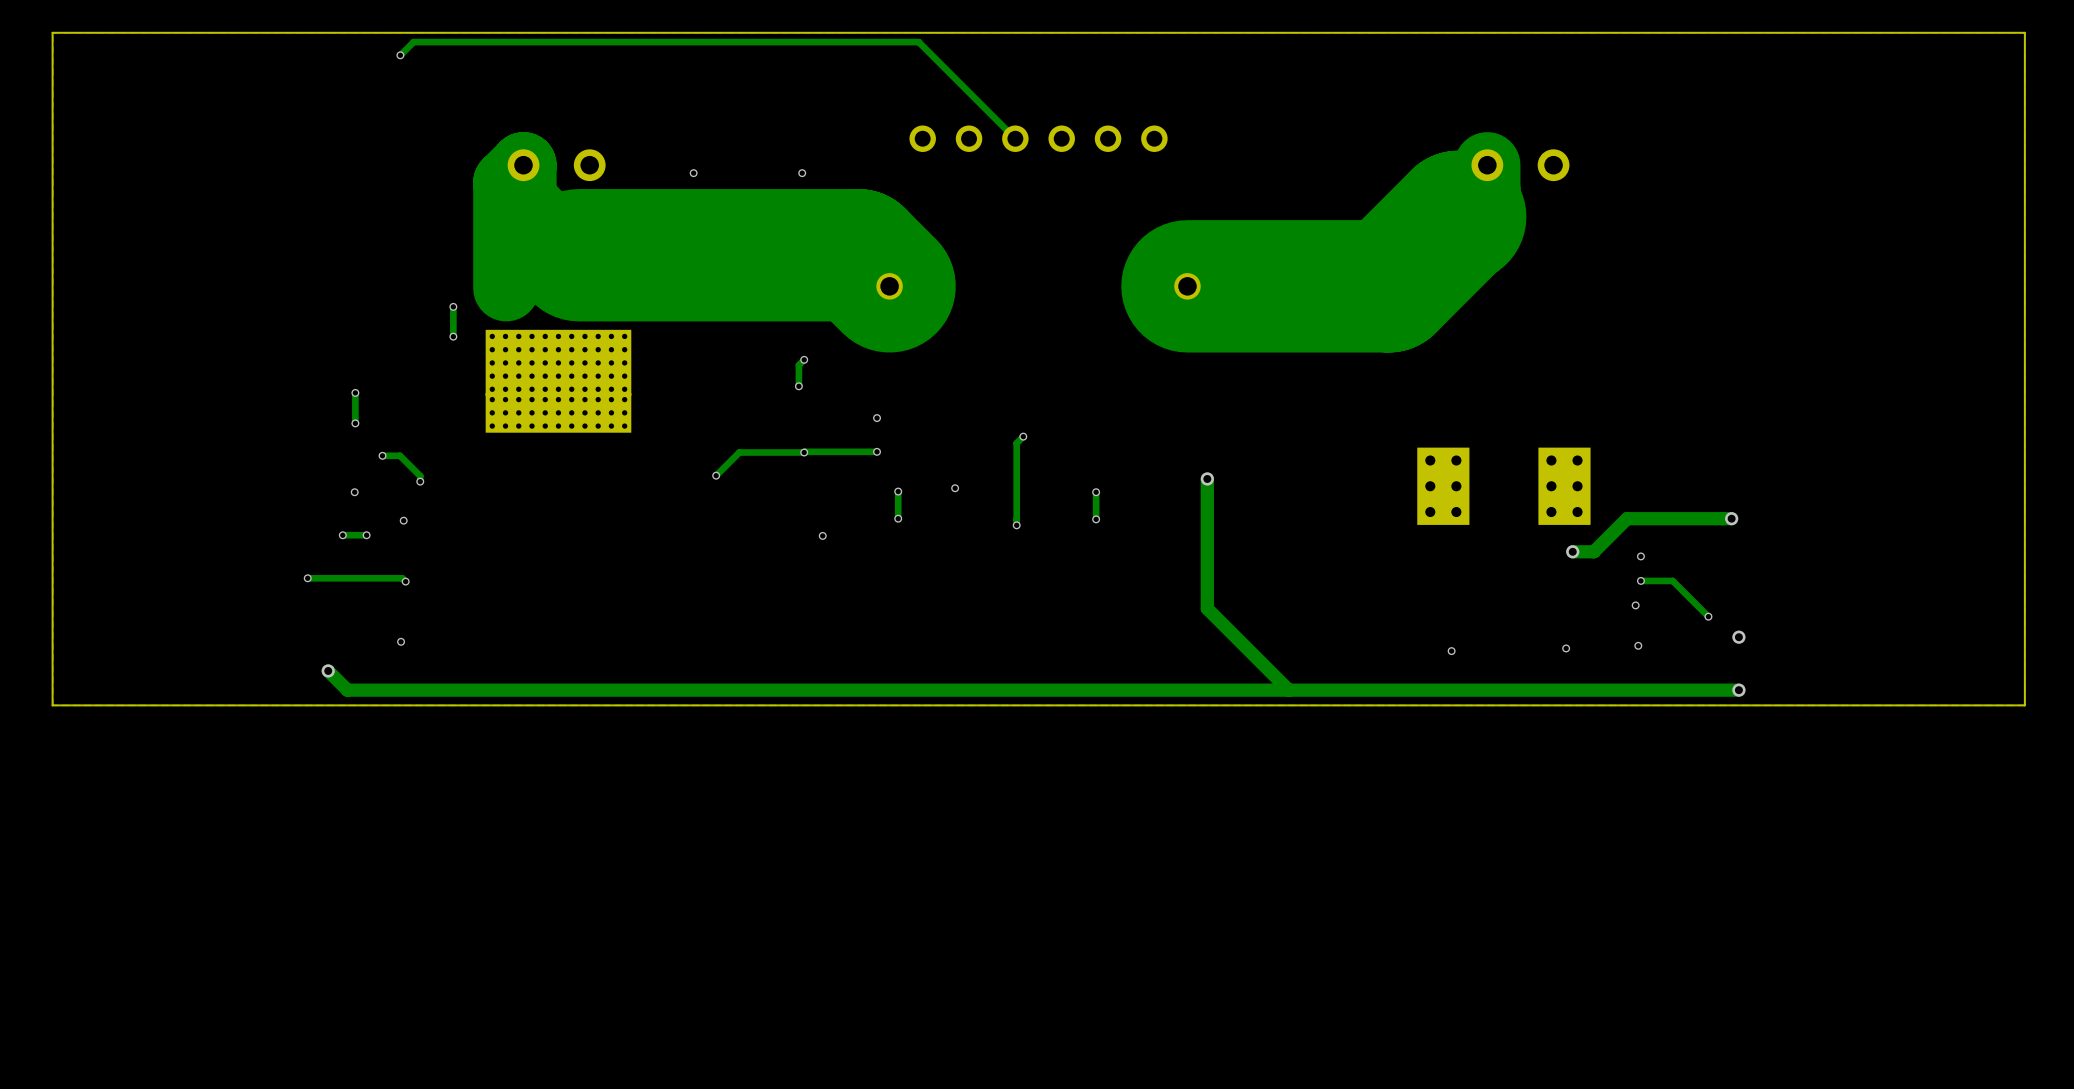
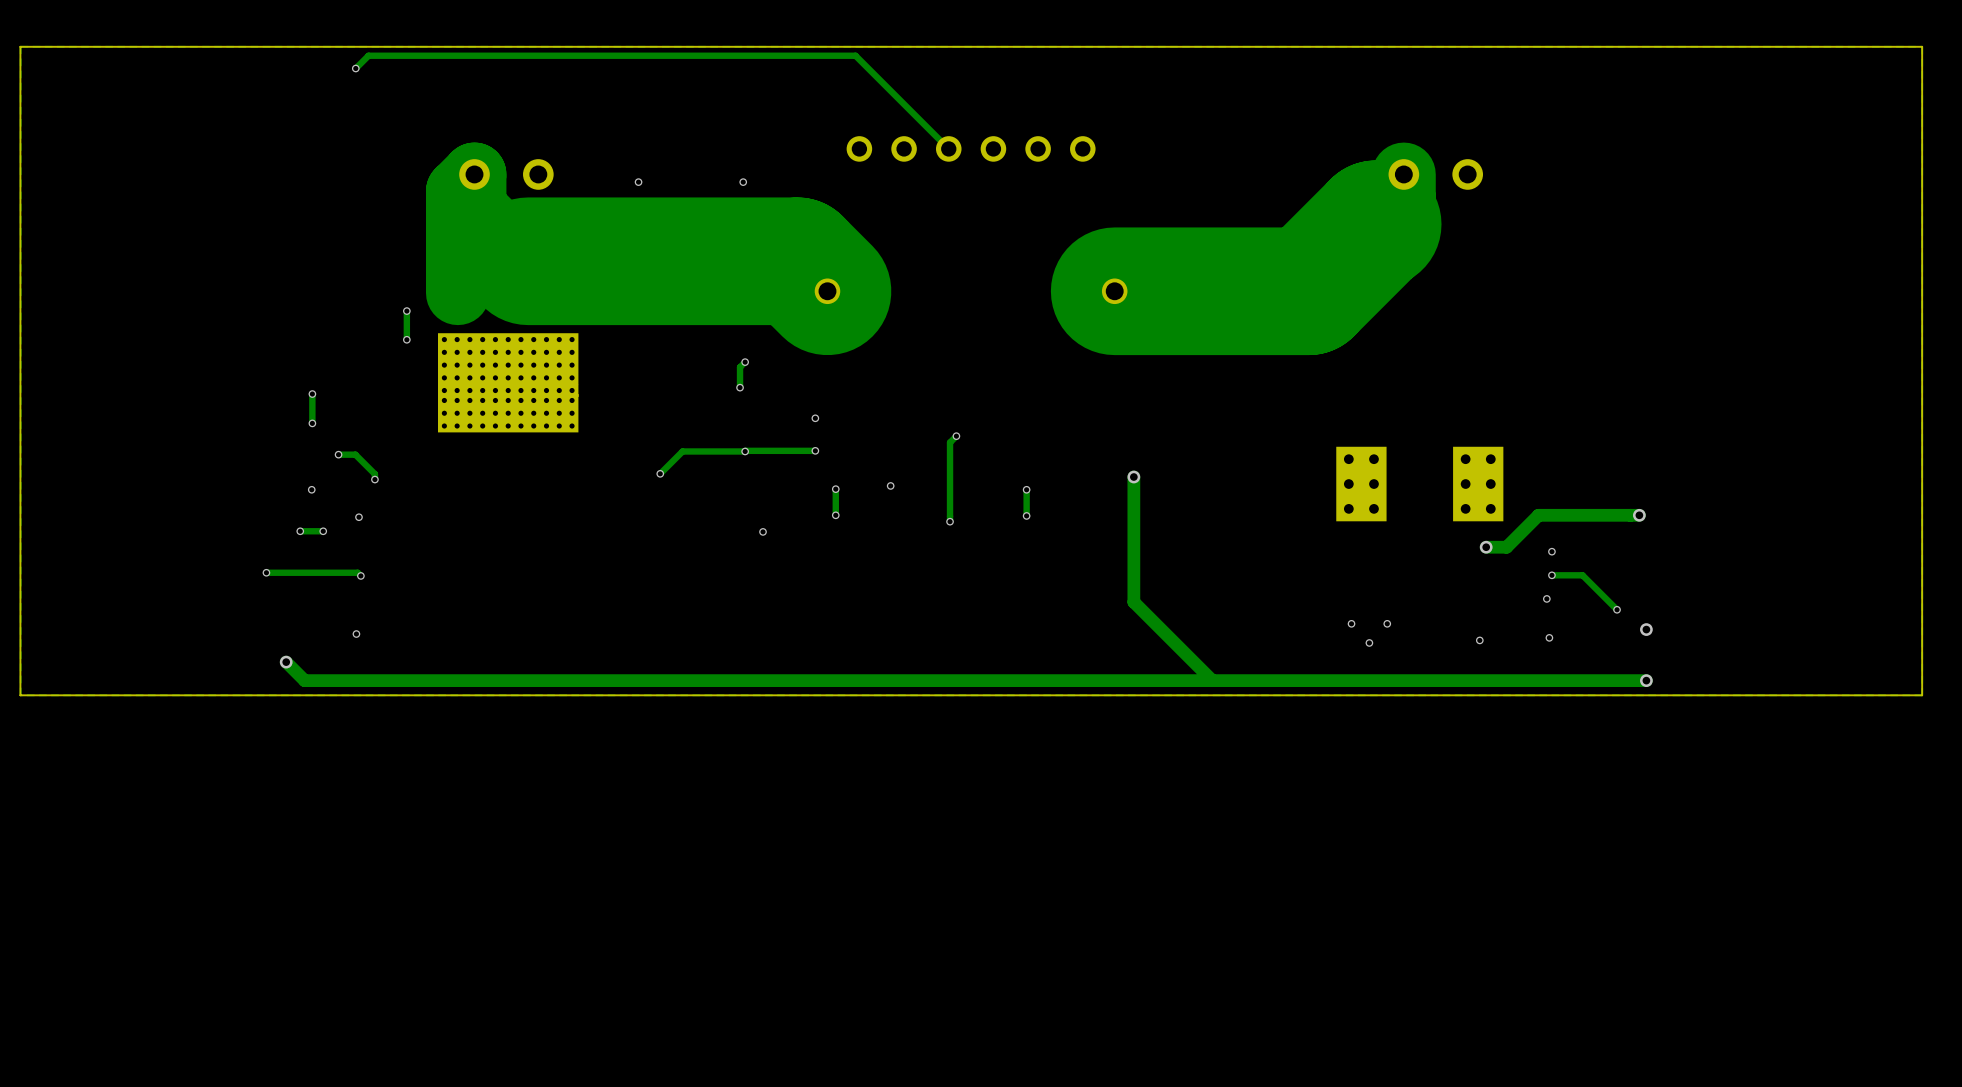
via: none -> (1351, 623)
via: none -> (1387, 623)

